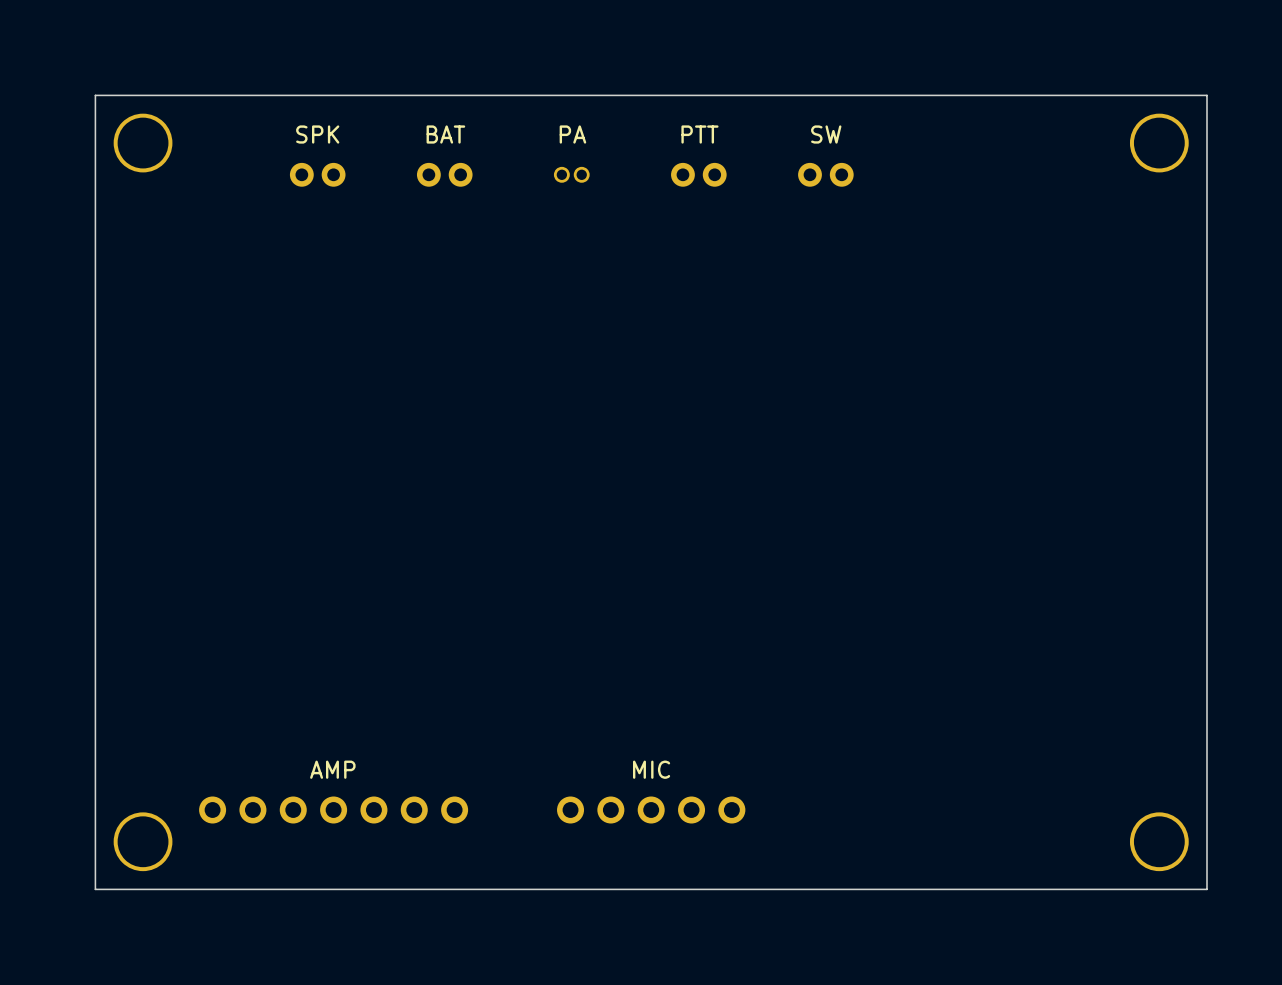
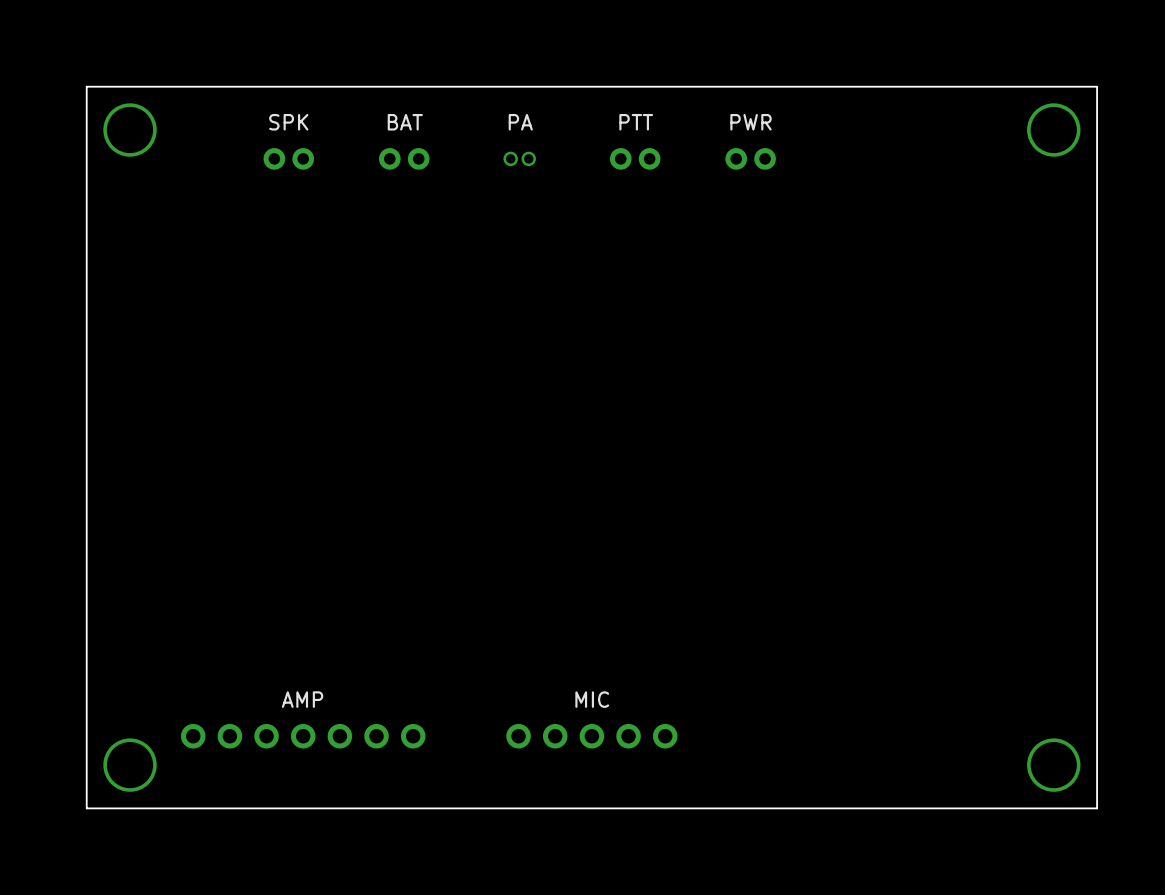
SW name: SW (826, 134) -> PWR (751, 122)

